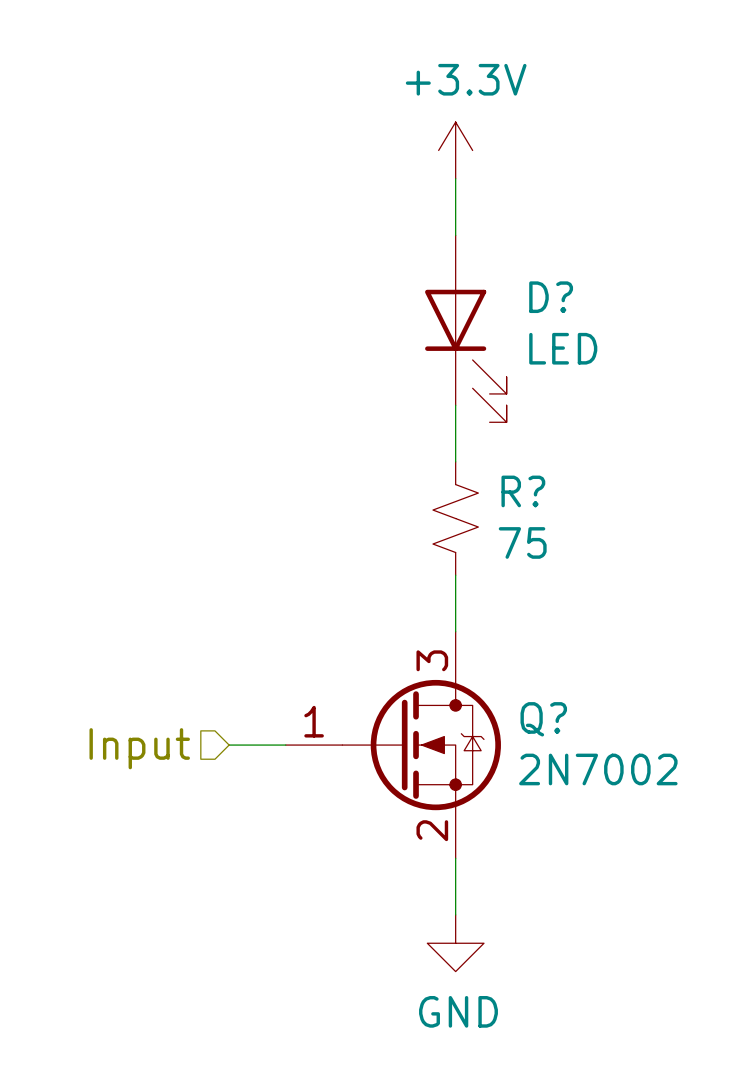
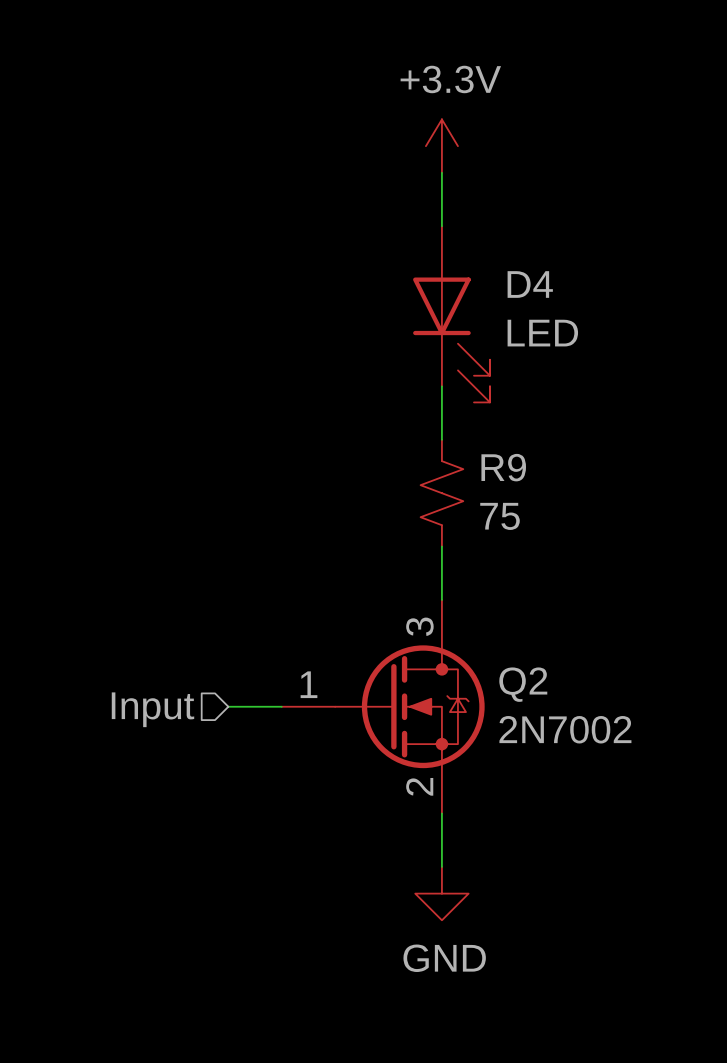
D? name: D? (551, 297) -> D4 (530, 284)
R? name: R? (523, 491) -> R9 (503, 467)
Q? name: Q? (543, 719) -> Q2 (523, 684)

